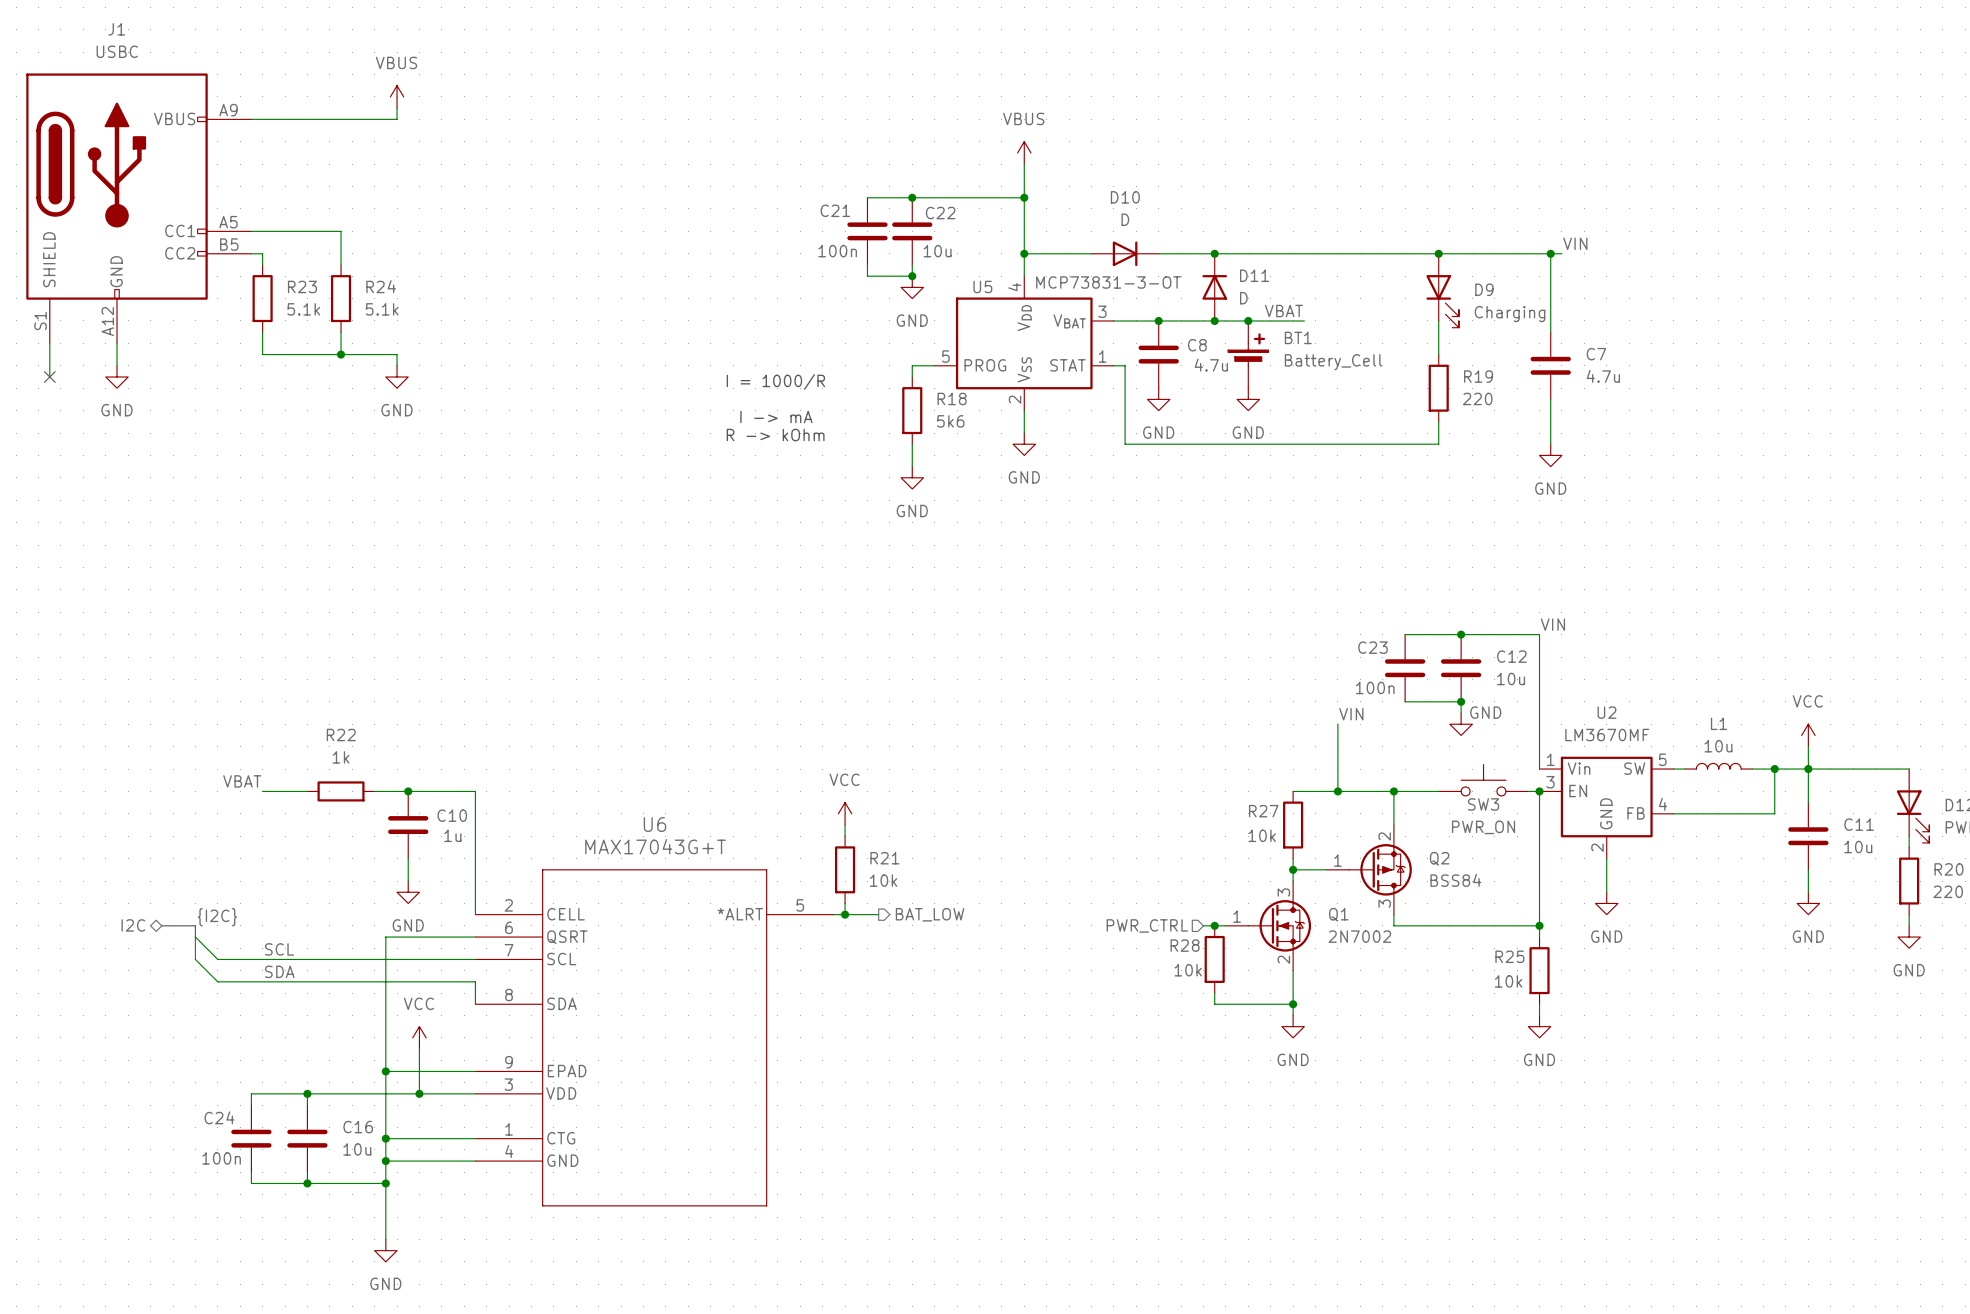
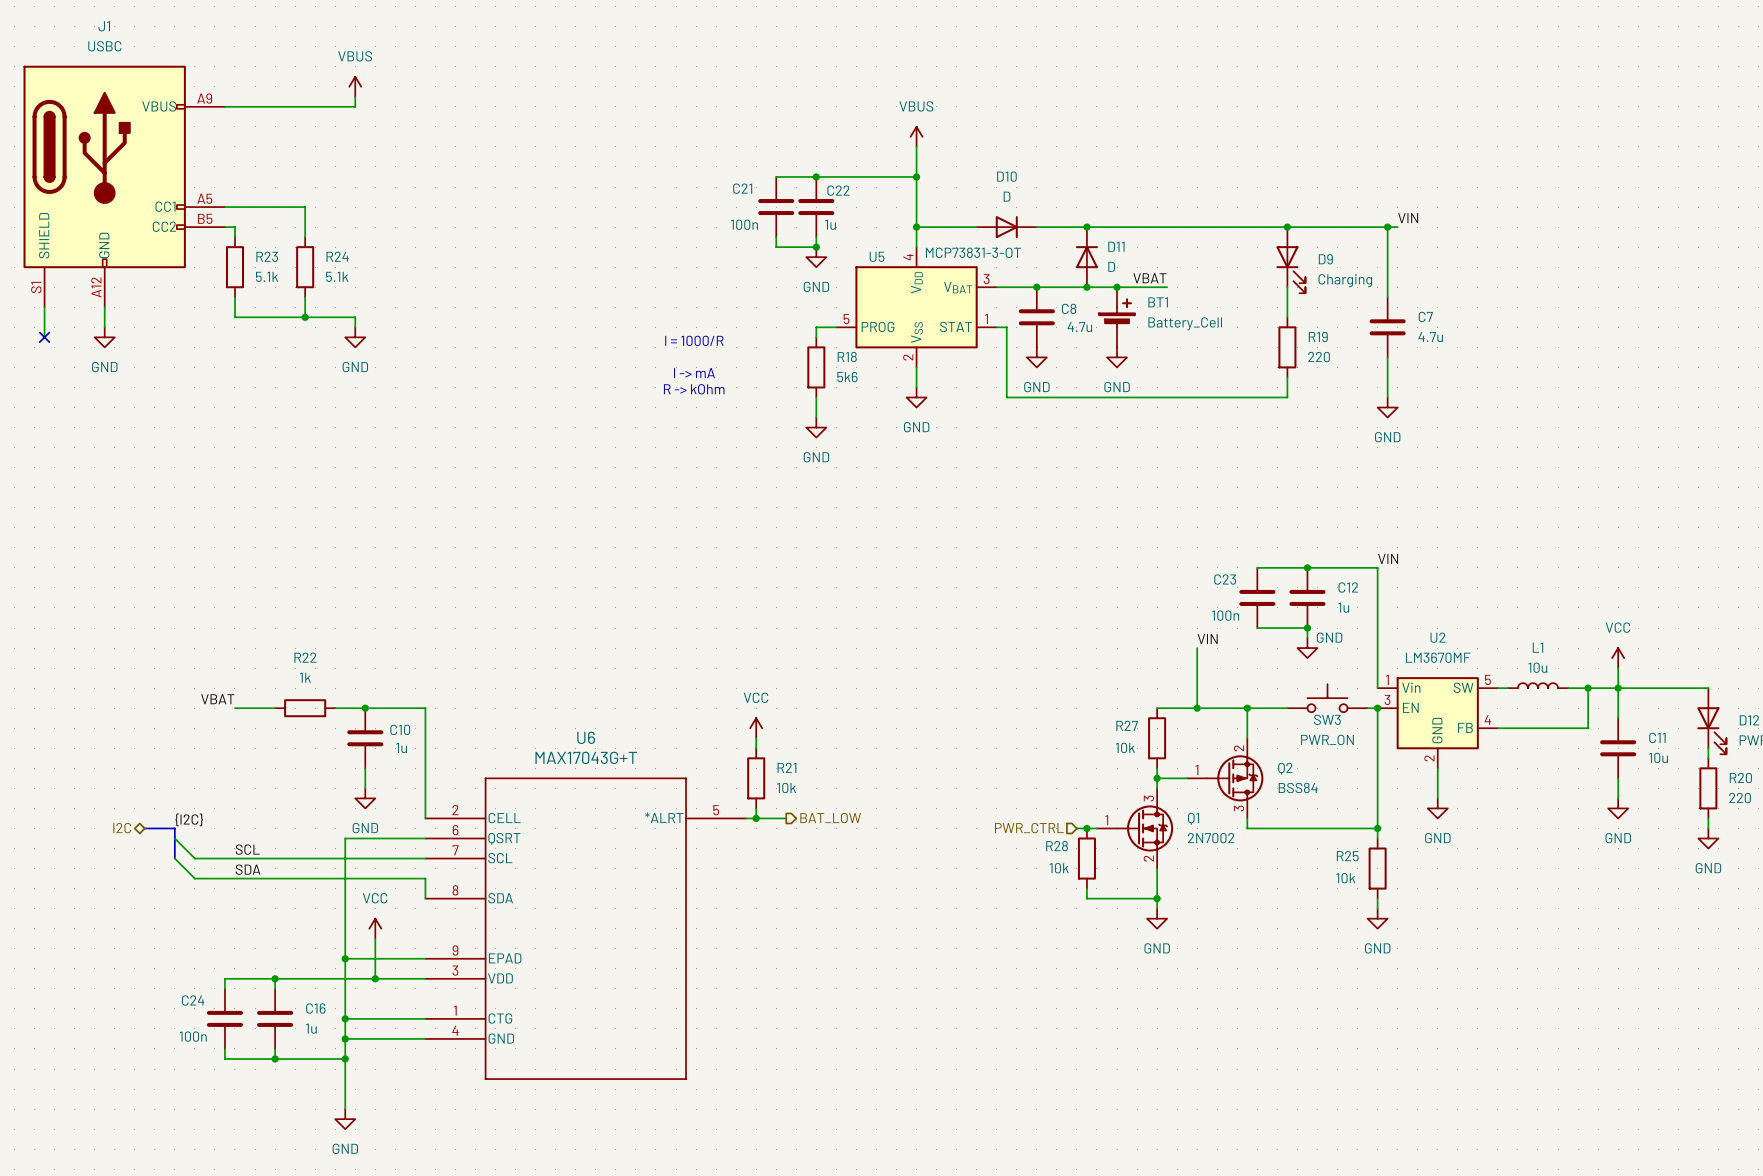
C22 value: 10u (937, 251) -> 1u (830, 224)
C12 value: 10u (1511, 679) -> 1u (1343, 607)
C16 value: 10u (357, 1149) -> 1u (311, 1028)

